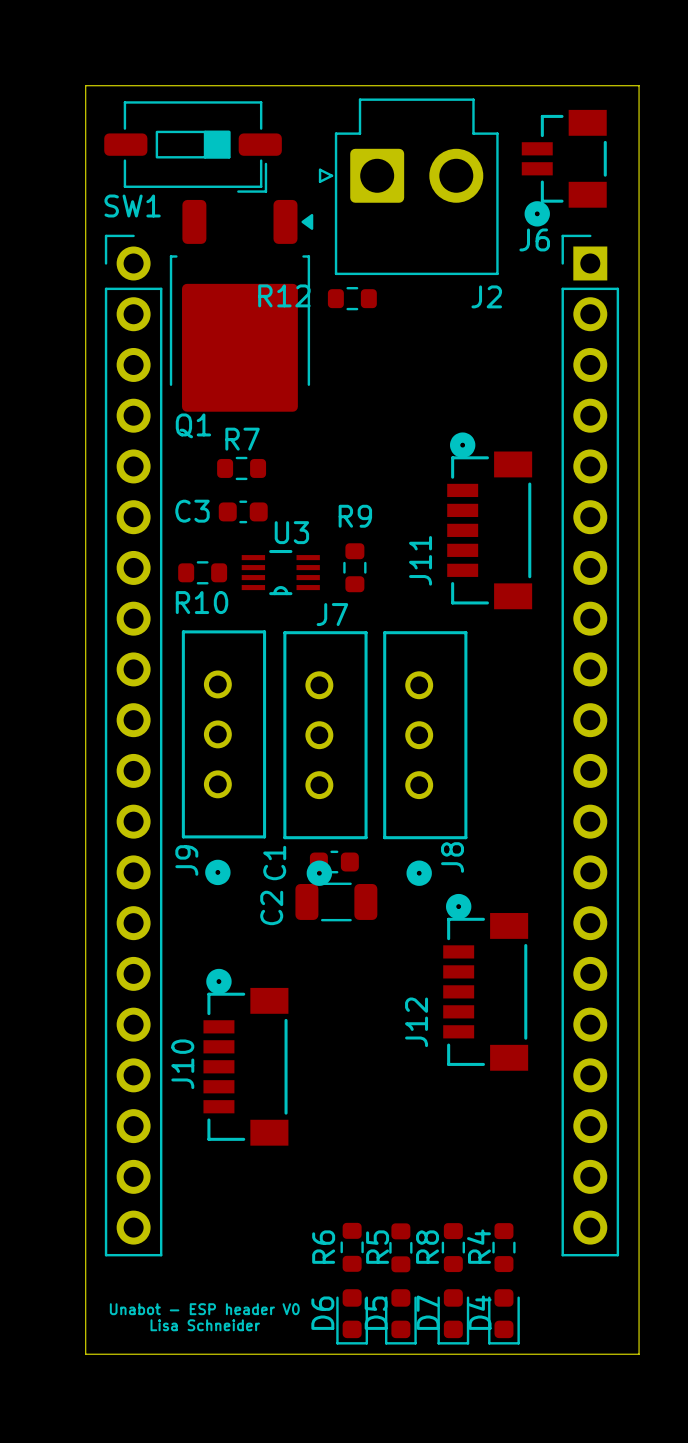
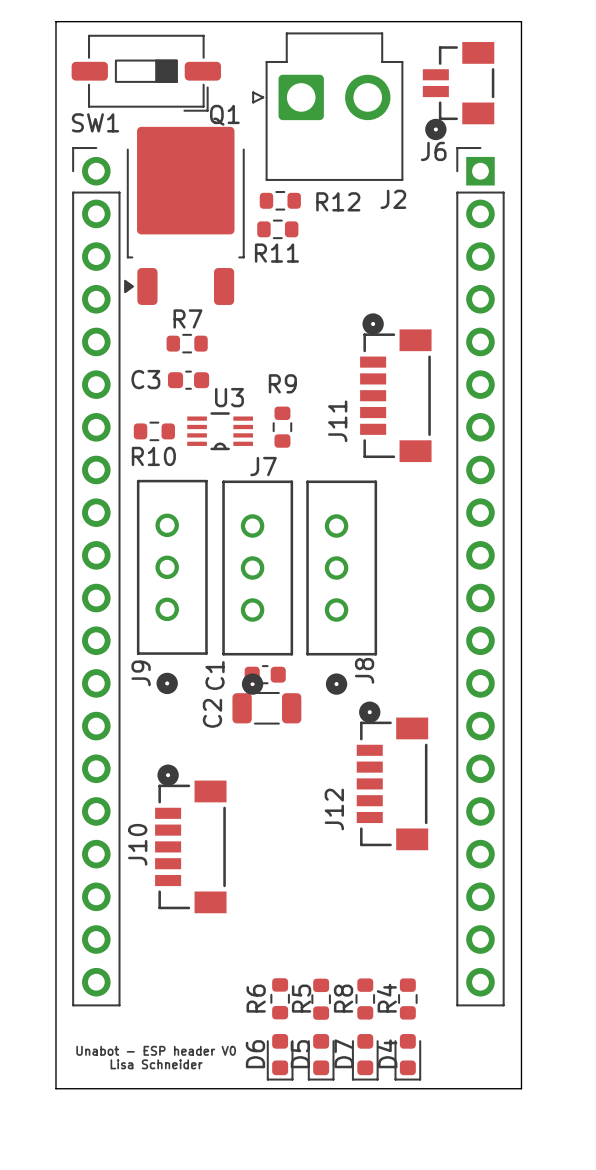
R12 name position: R12 (284, 295) -> R12 (338, 201)
Q1 rotation: 0° (241, 305) -> 180° (184, 215)
R11: none -> (277, 229)

